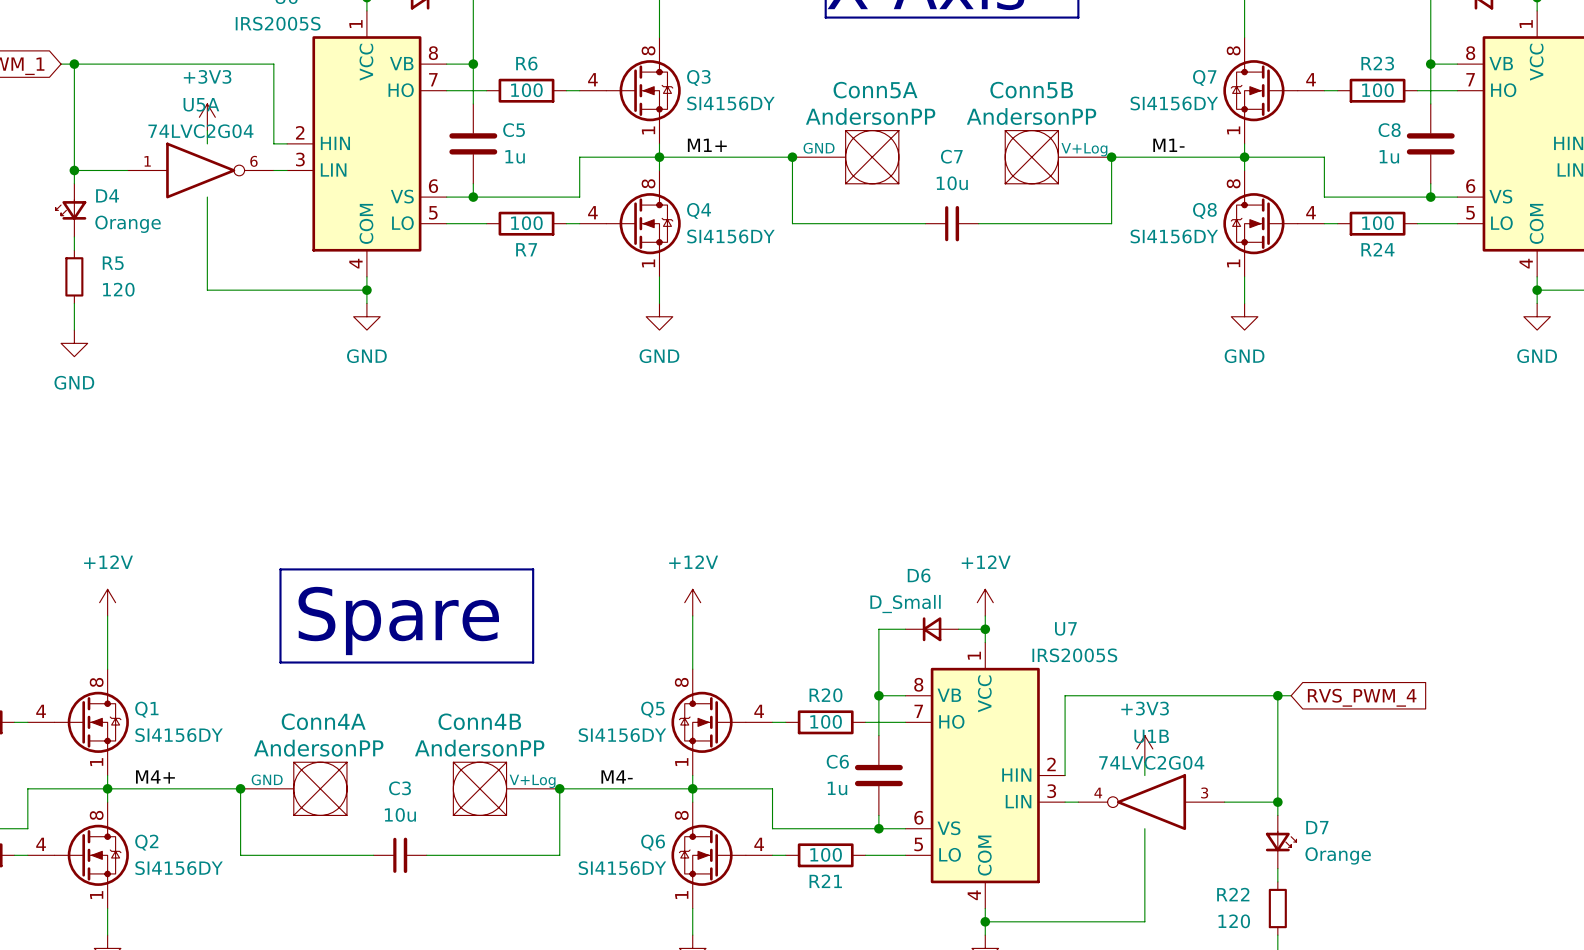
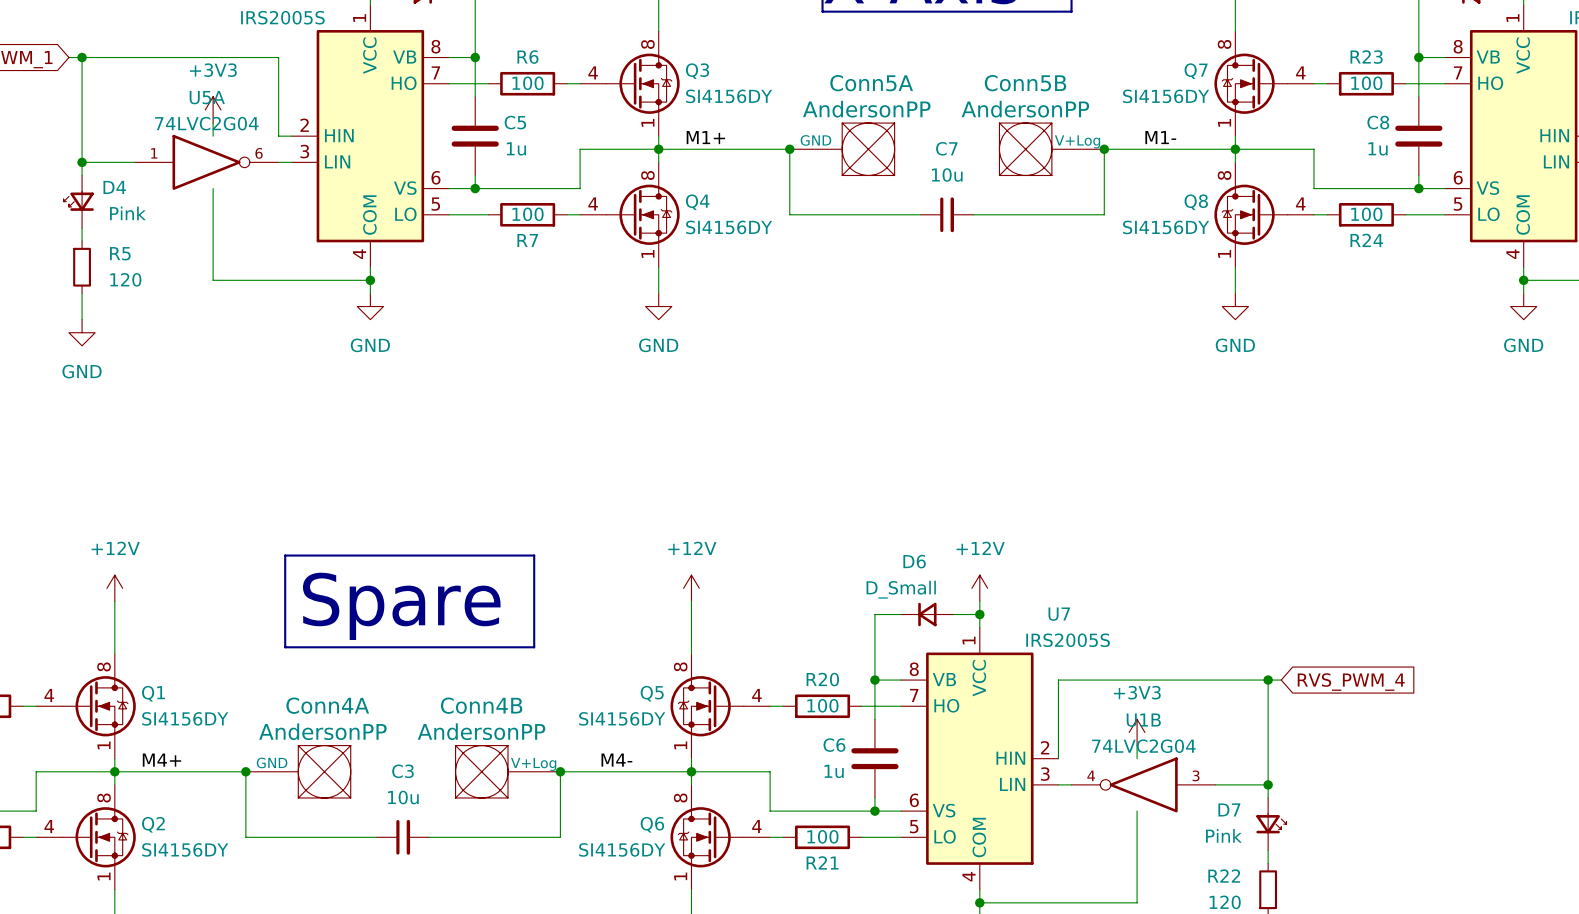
D4 value: Orange (128, 224) -> Pink (127, 213)
D7 name position: D7 (1317, 827) -> D7 (1229, 809)
D7 value: Orange (1338, 855) -> Pink (1223, 835)

